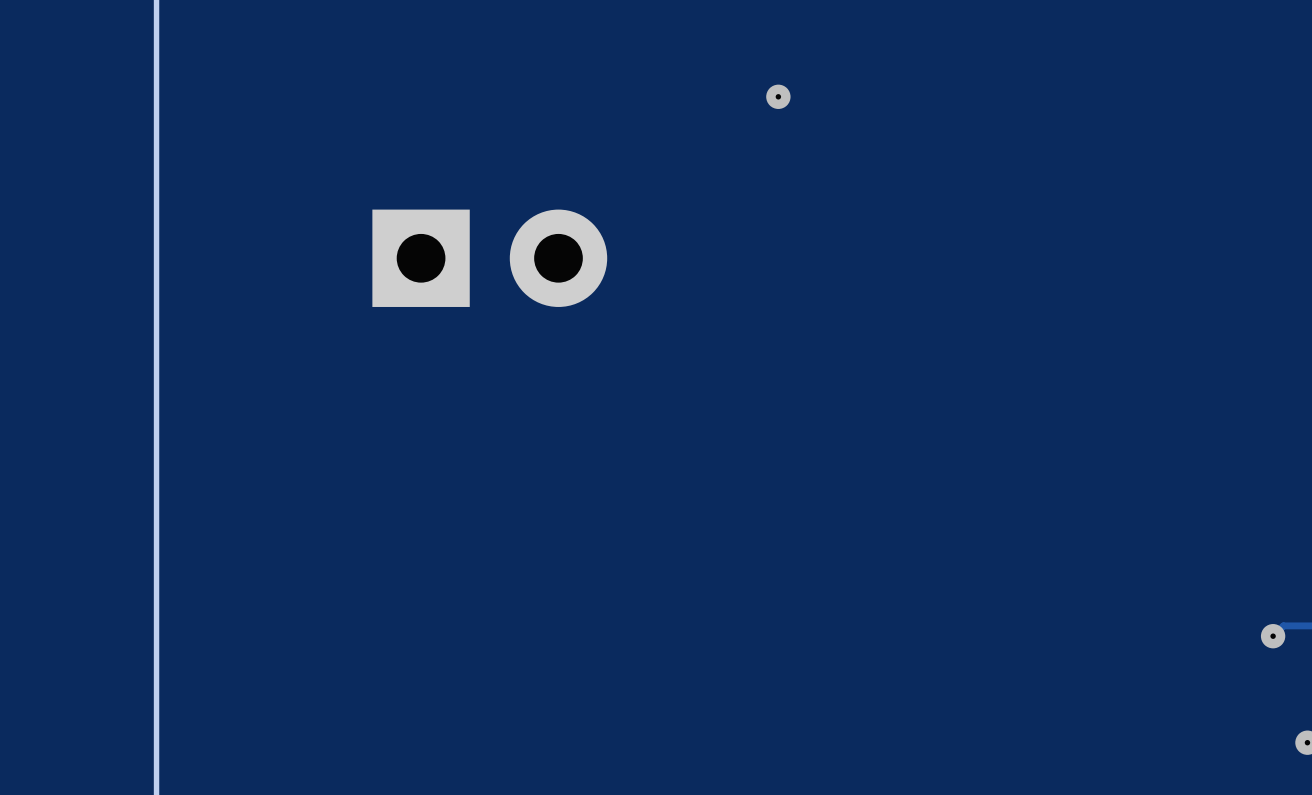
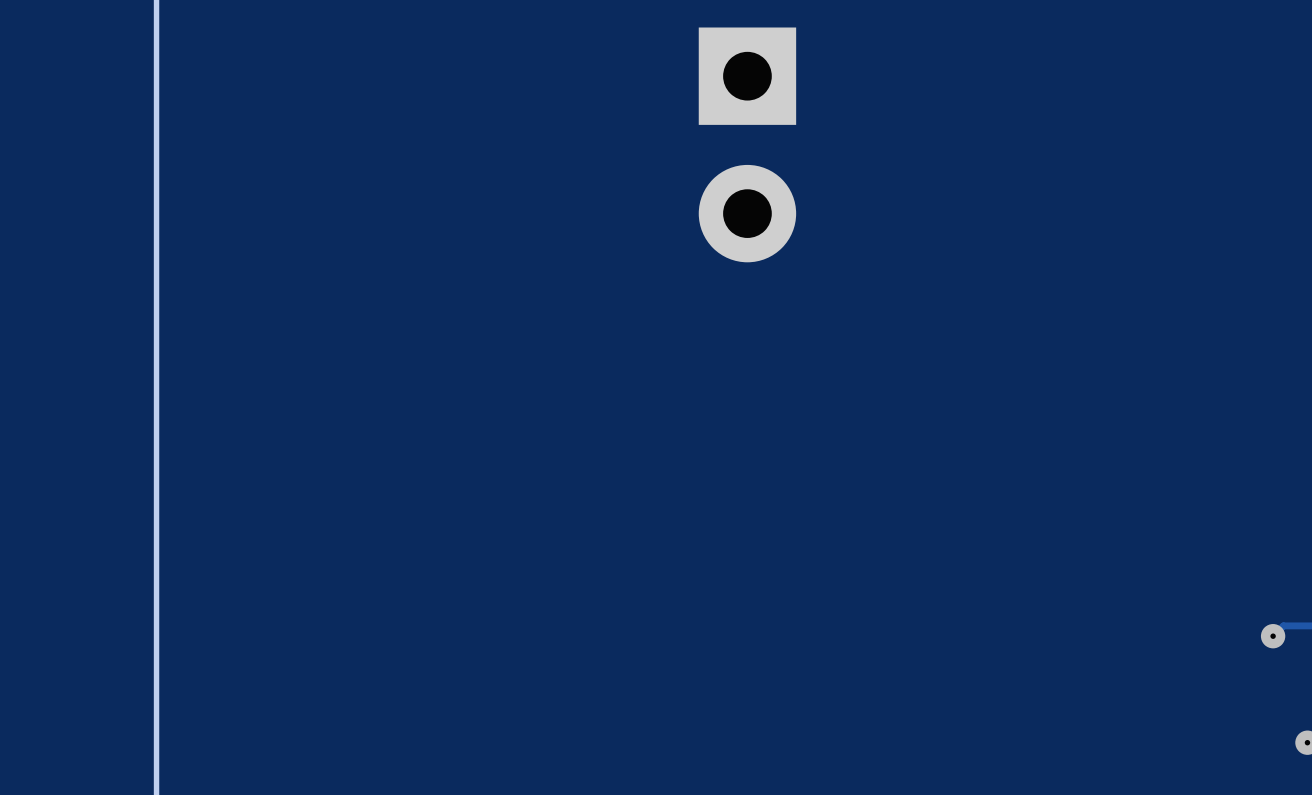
via: (778, 96) -> none
part rotation: 0° (489, 258) -> 90° clockwise (747, 144)
part position: (489, 258) -> (747, 144)

